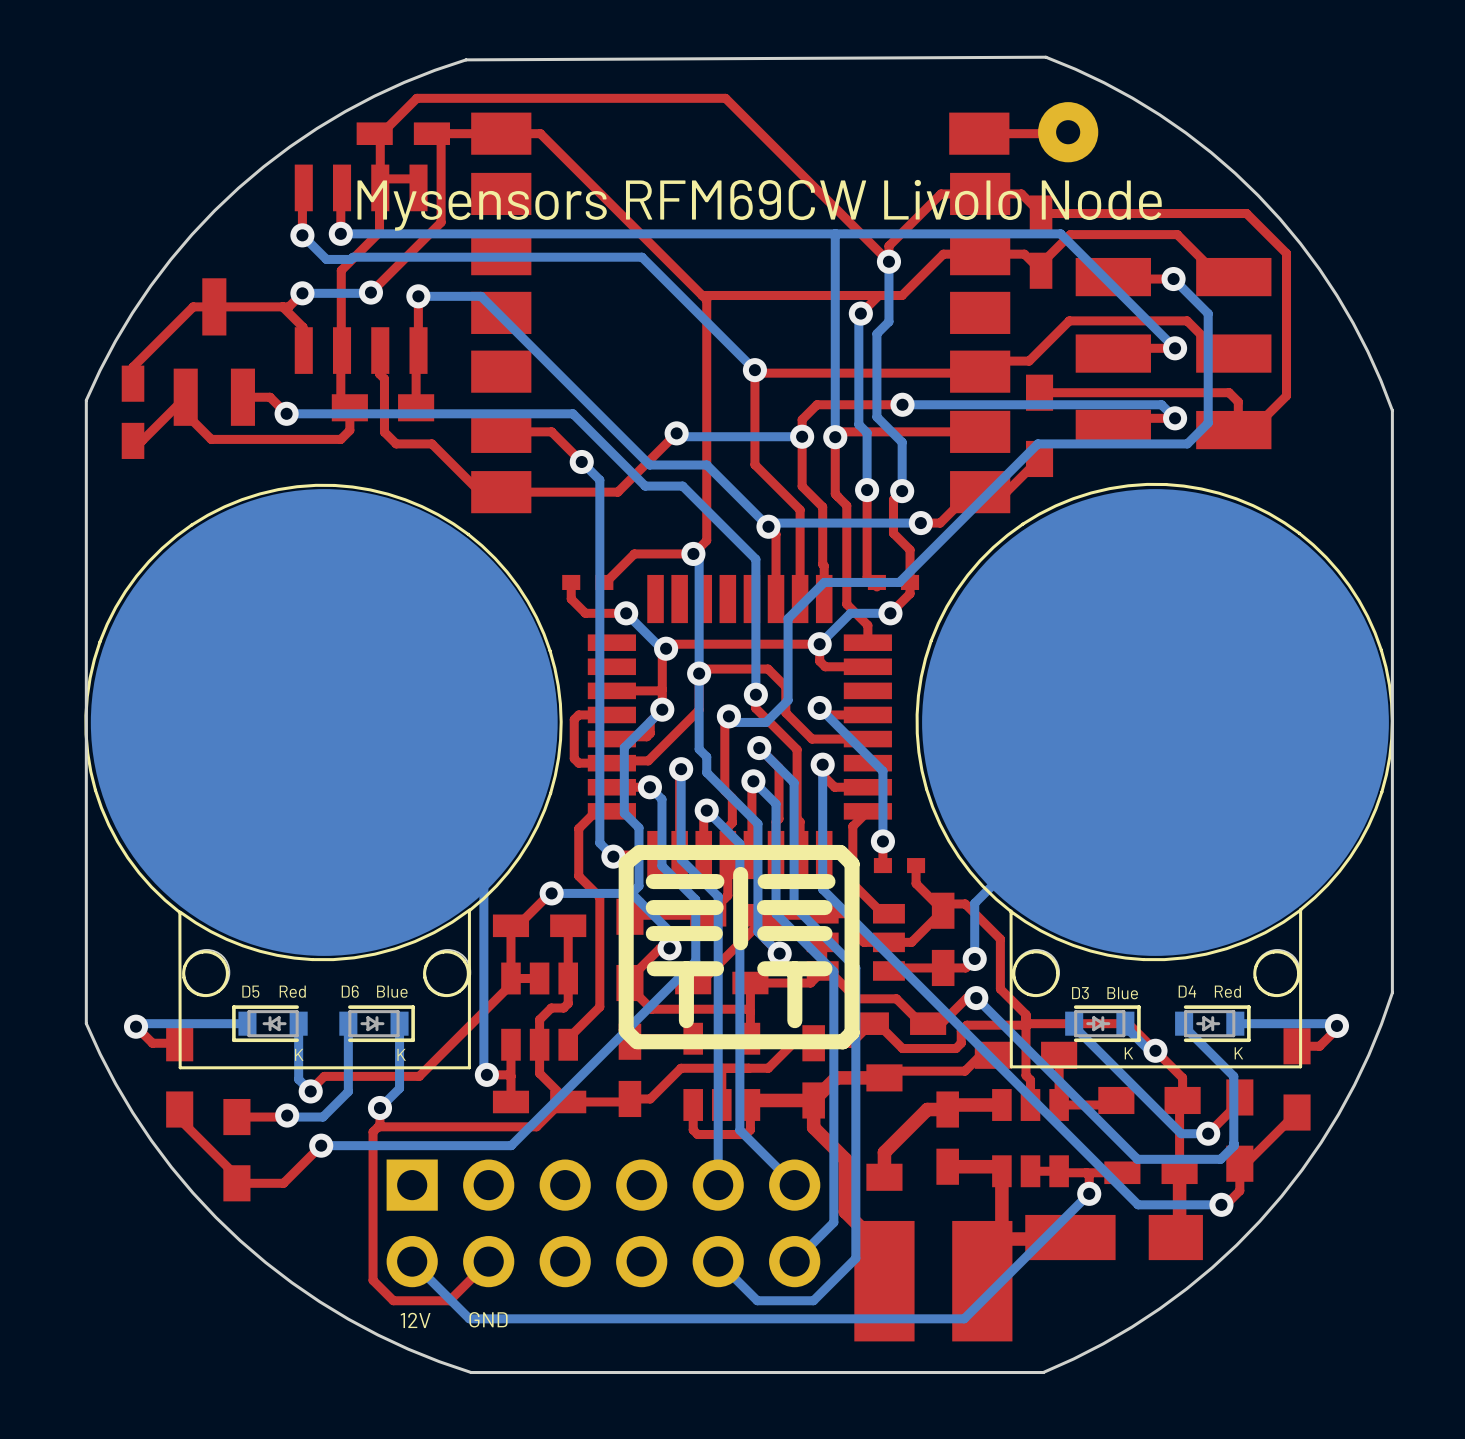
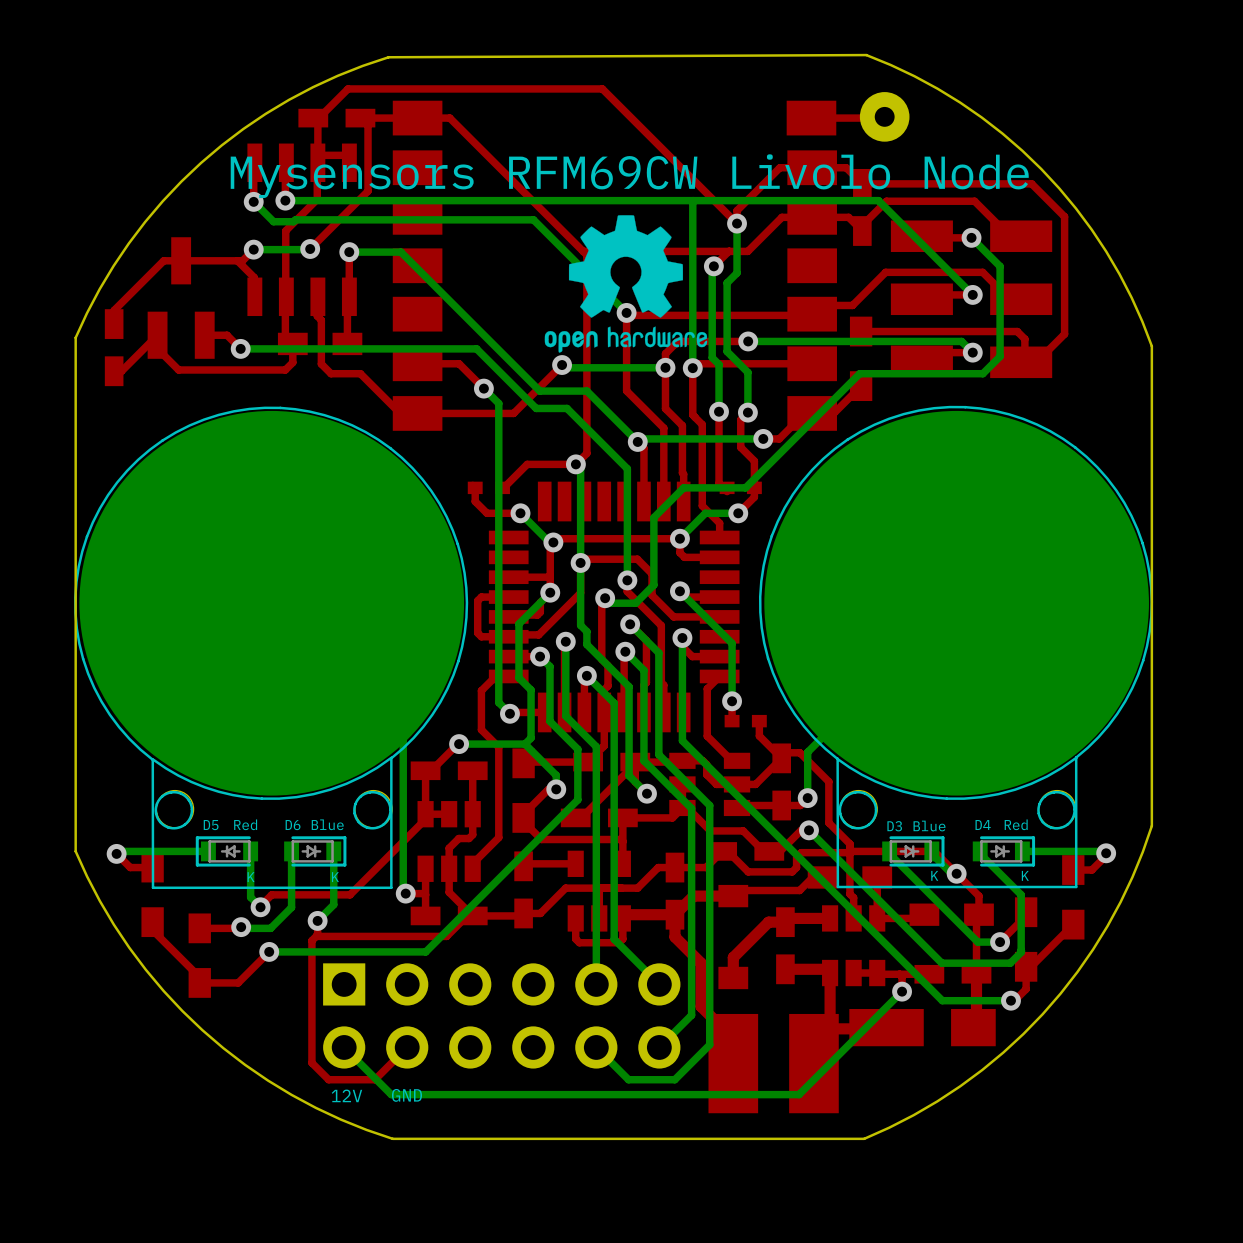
drawing: none -> [544, 215, 708, 353]
drawing: [618, 844, 860, 1050] -> none

